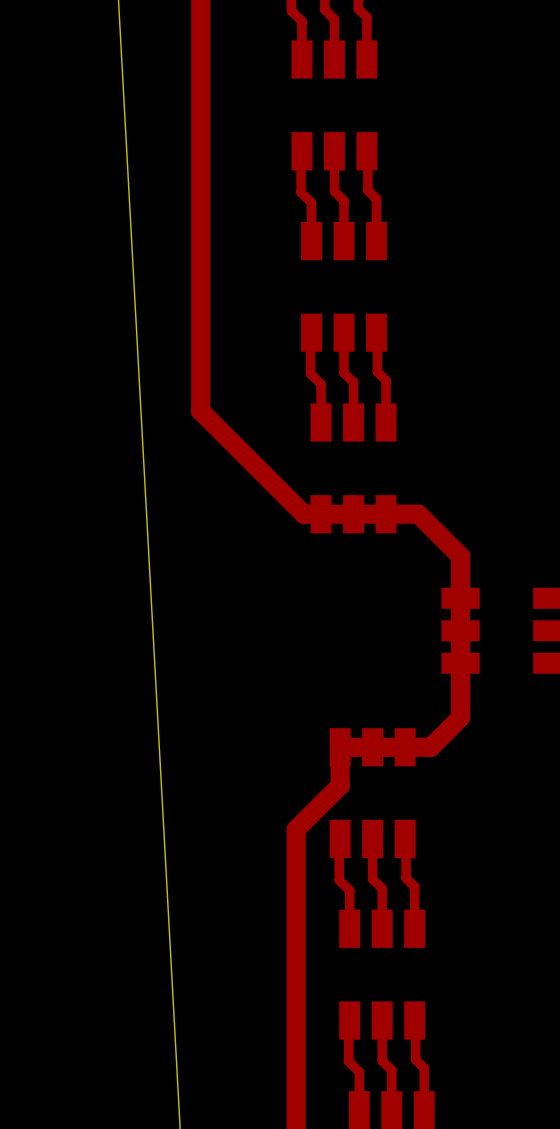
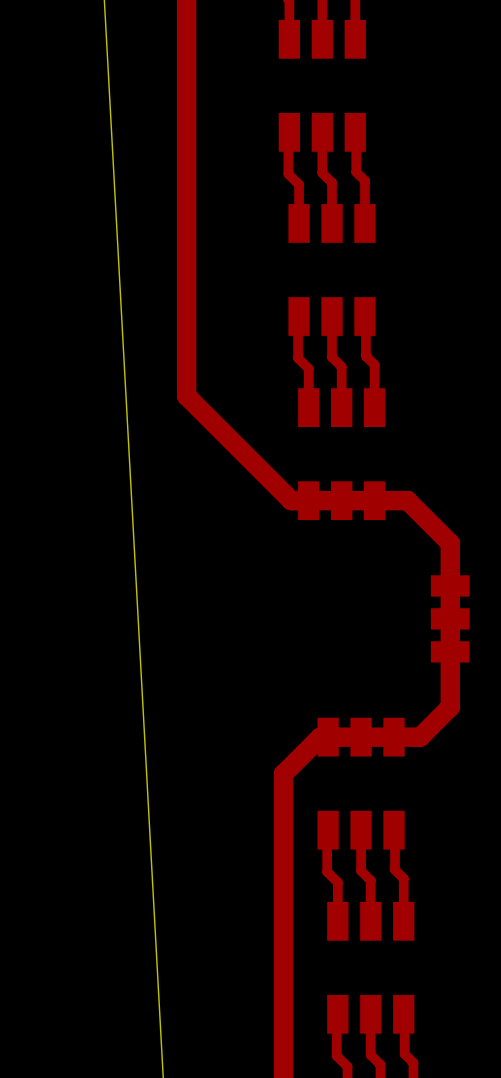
top track: (340, 747) (340, 785) (296, 829) -> (328, 737) (320, 737) (283, 773) (283, 820)

